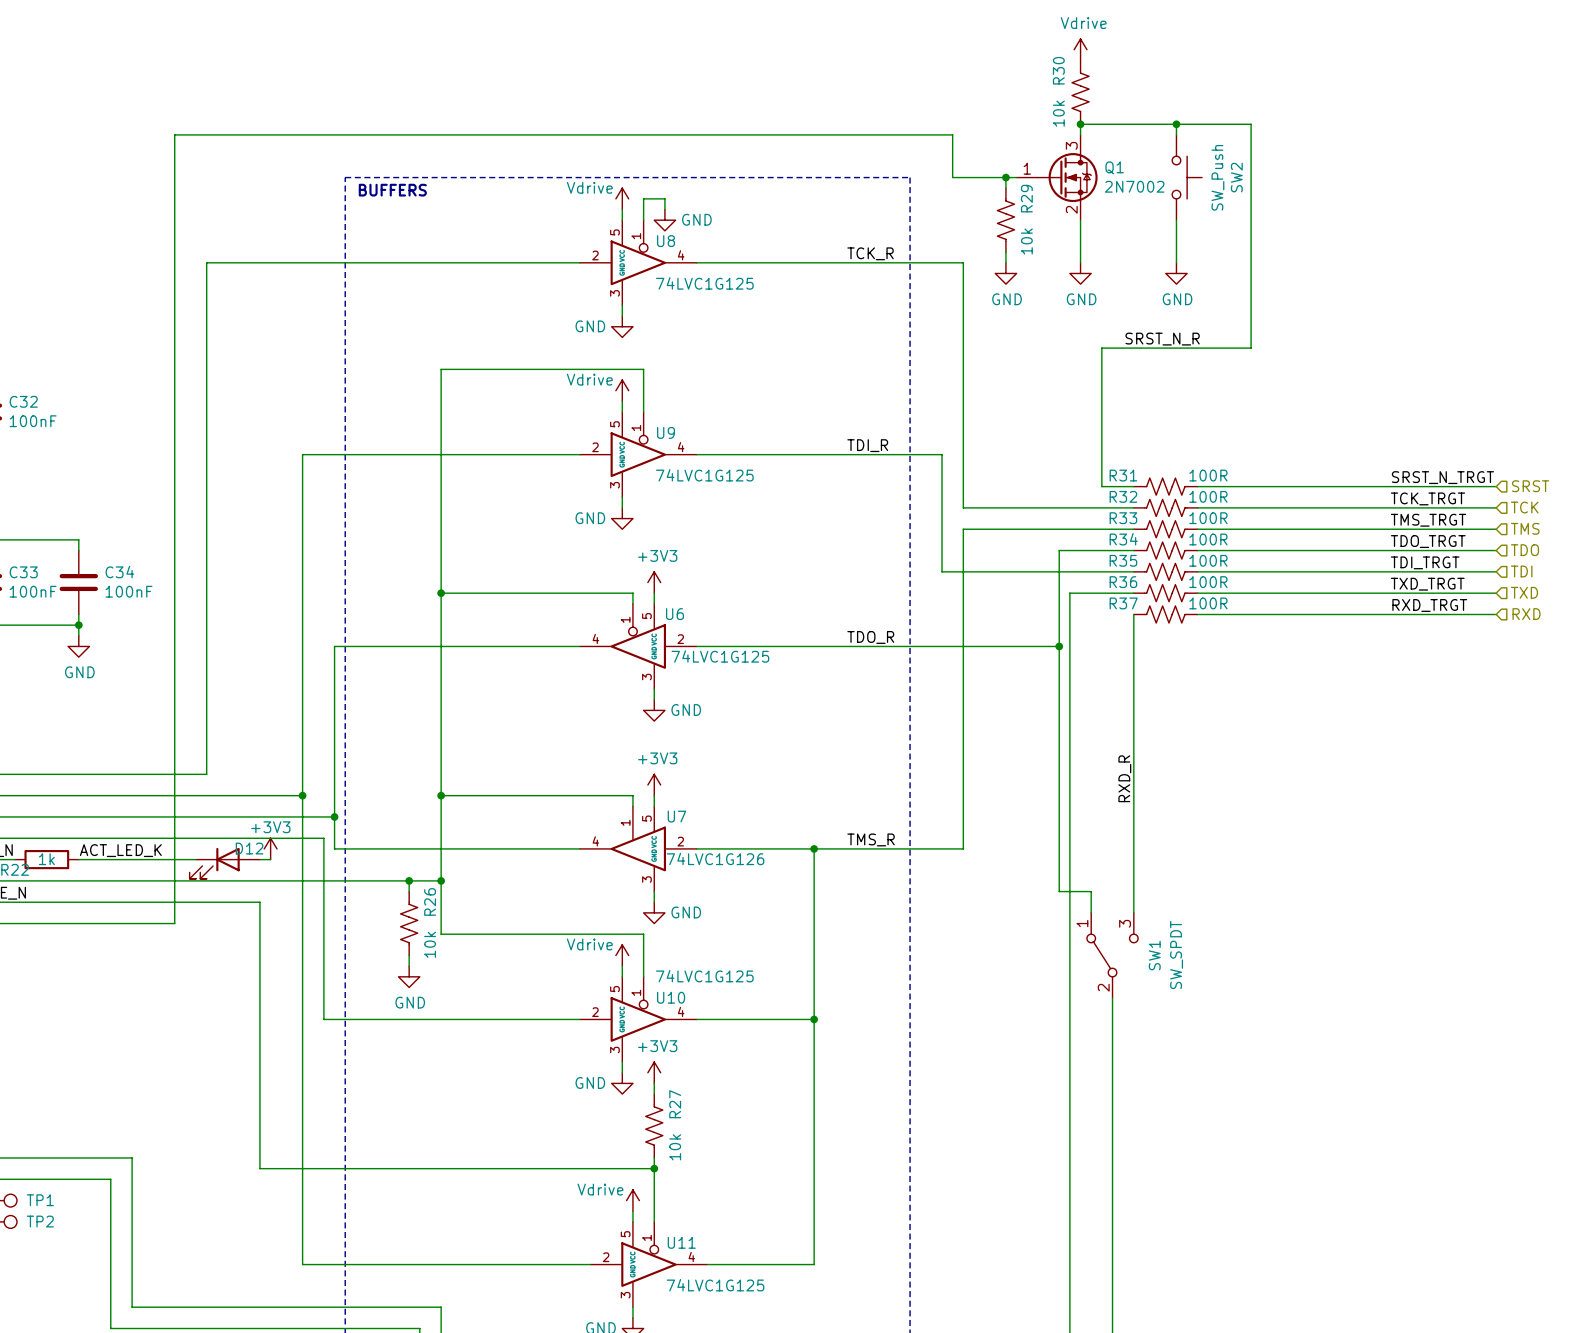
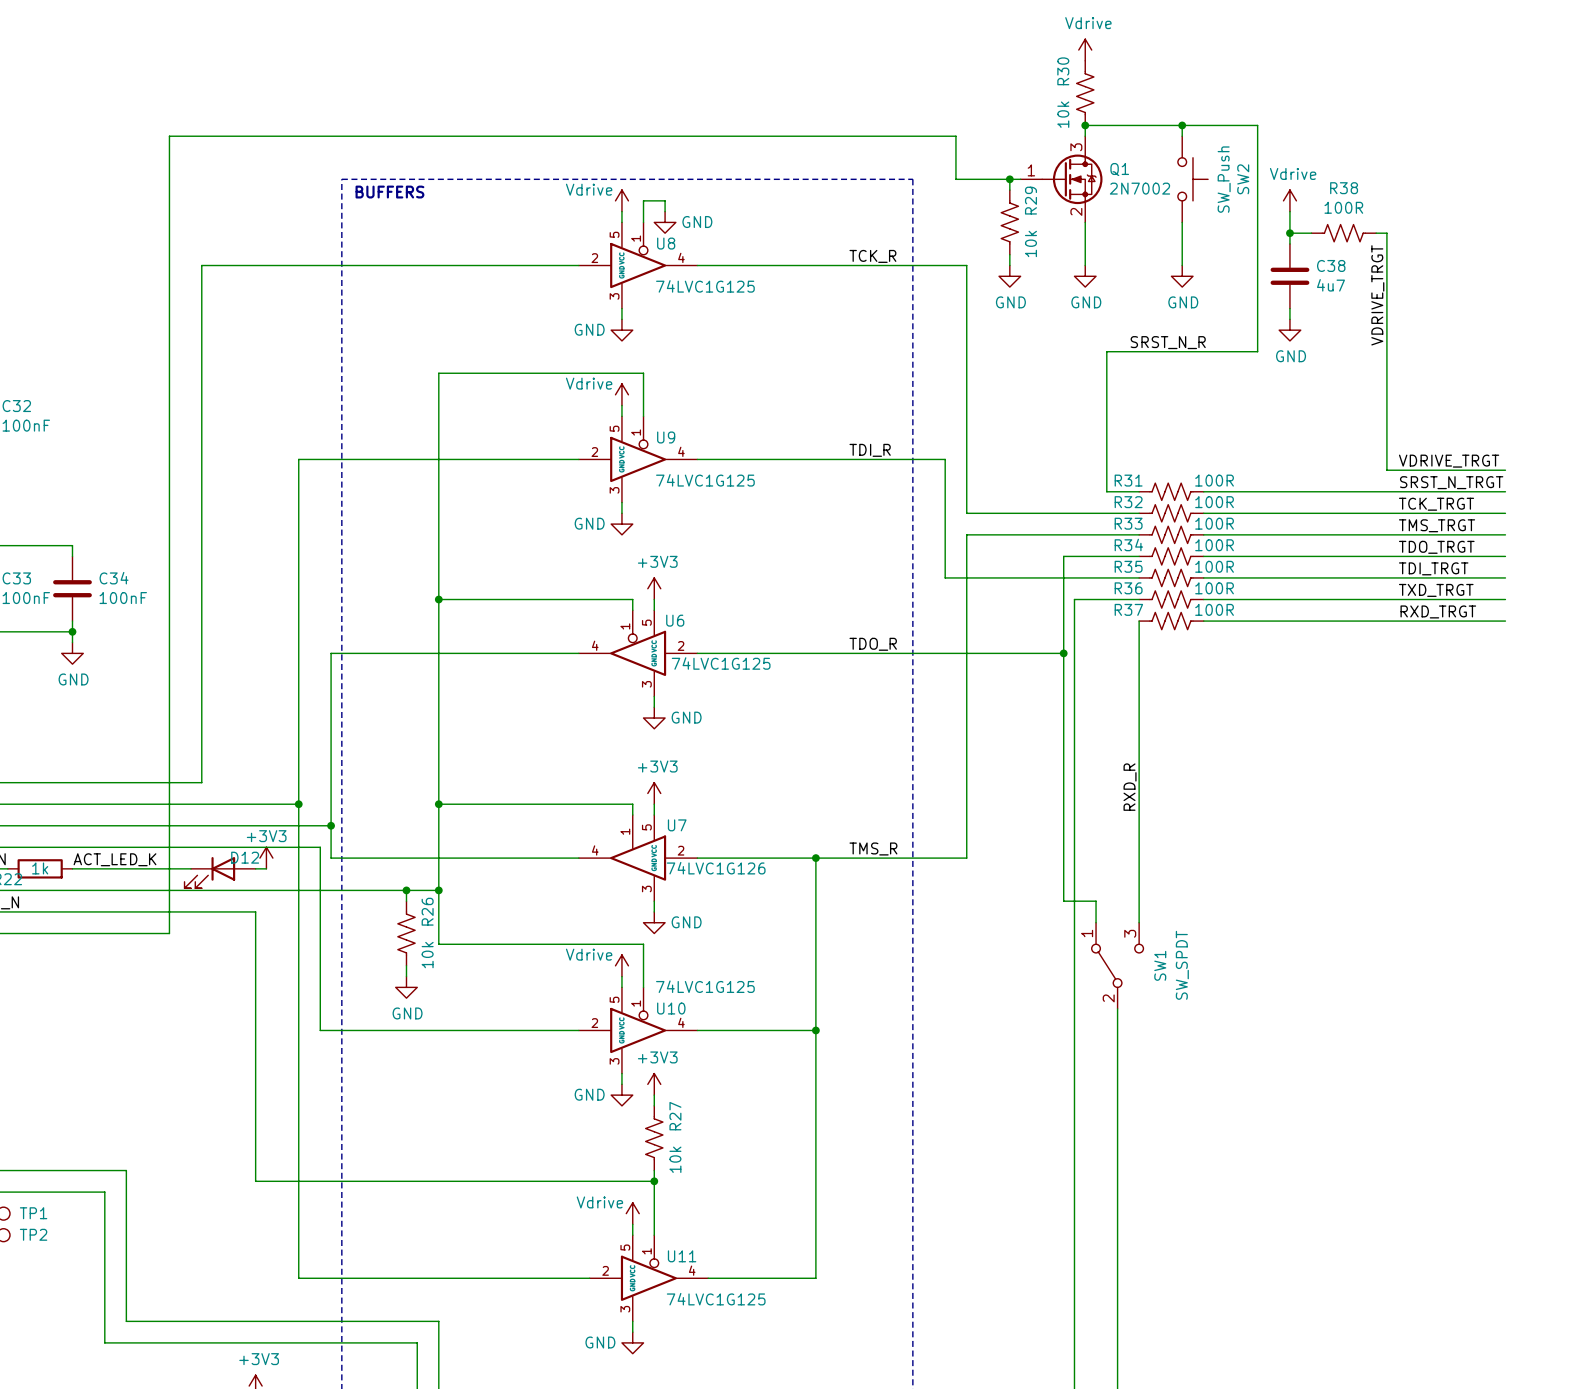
power symbol: none -> Vdrive (1289, 200)
wire: none -> (1289, 211) (1289, 243)
wire: none -> (1289, 233) (1311, 233)
junction: none -> (1289, 233)
R38: none -> 100R (1343, 233)
wire: none -> (1376, 233) (1386, 233) (1386, 470) (1505, 470)
C38: none -> 4u7 (1289, 276)
label: none -> VDRIVE_TRGT (1377, 295)
wire: none -> (1289, 308) (1289, 319)
power symbol: none -> GND (1289, 330)
label: none -> VDRIVE_TRGT (1449, 461)
hierarchical label: SRST (1530, 486) -> none
hierarchical label: TCK (1524, 507) -> none
hierarchical label: TMS (1525, 528) -> none
hierarchical label: TDO (1525, 550) -> none
hierarchical label: TDI (1521, 571) -> none
hierarchical label: TXD (1524, 592) -> none
hierarchical label: RXD (1526, 614) -> none

